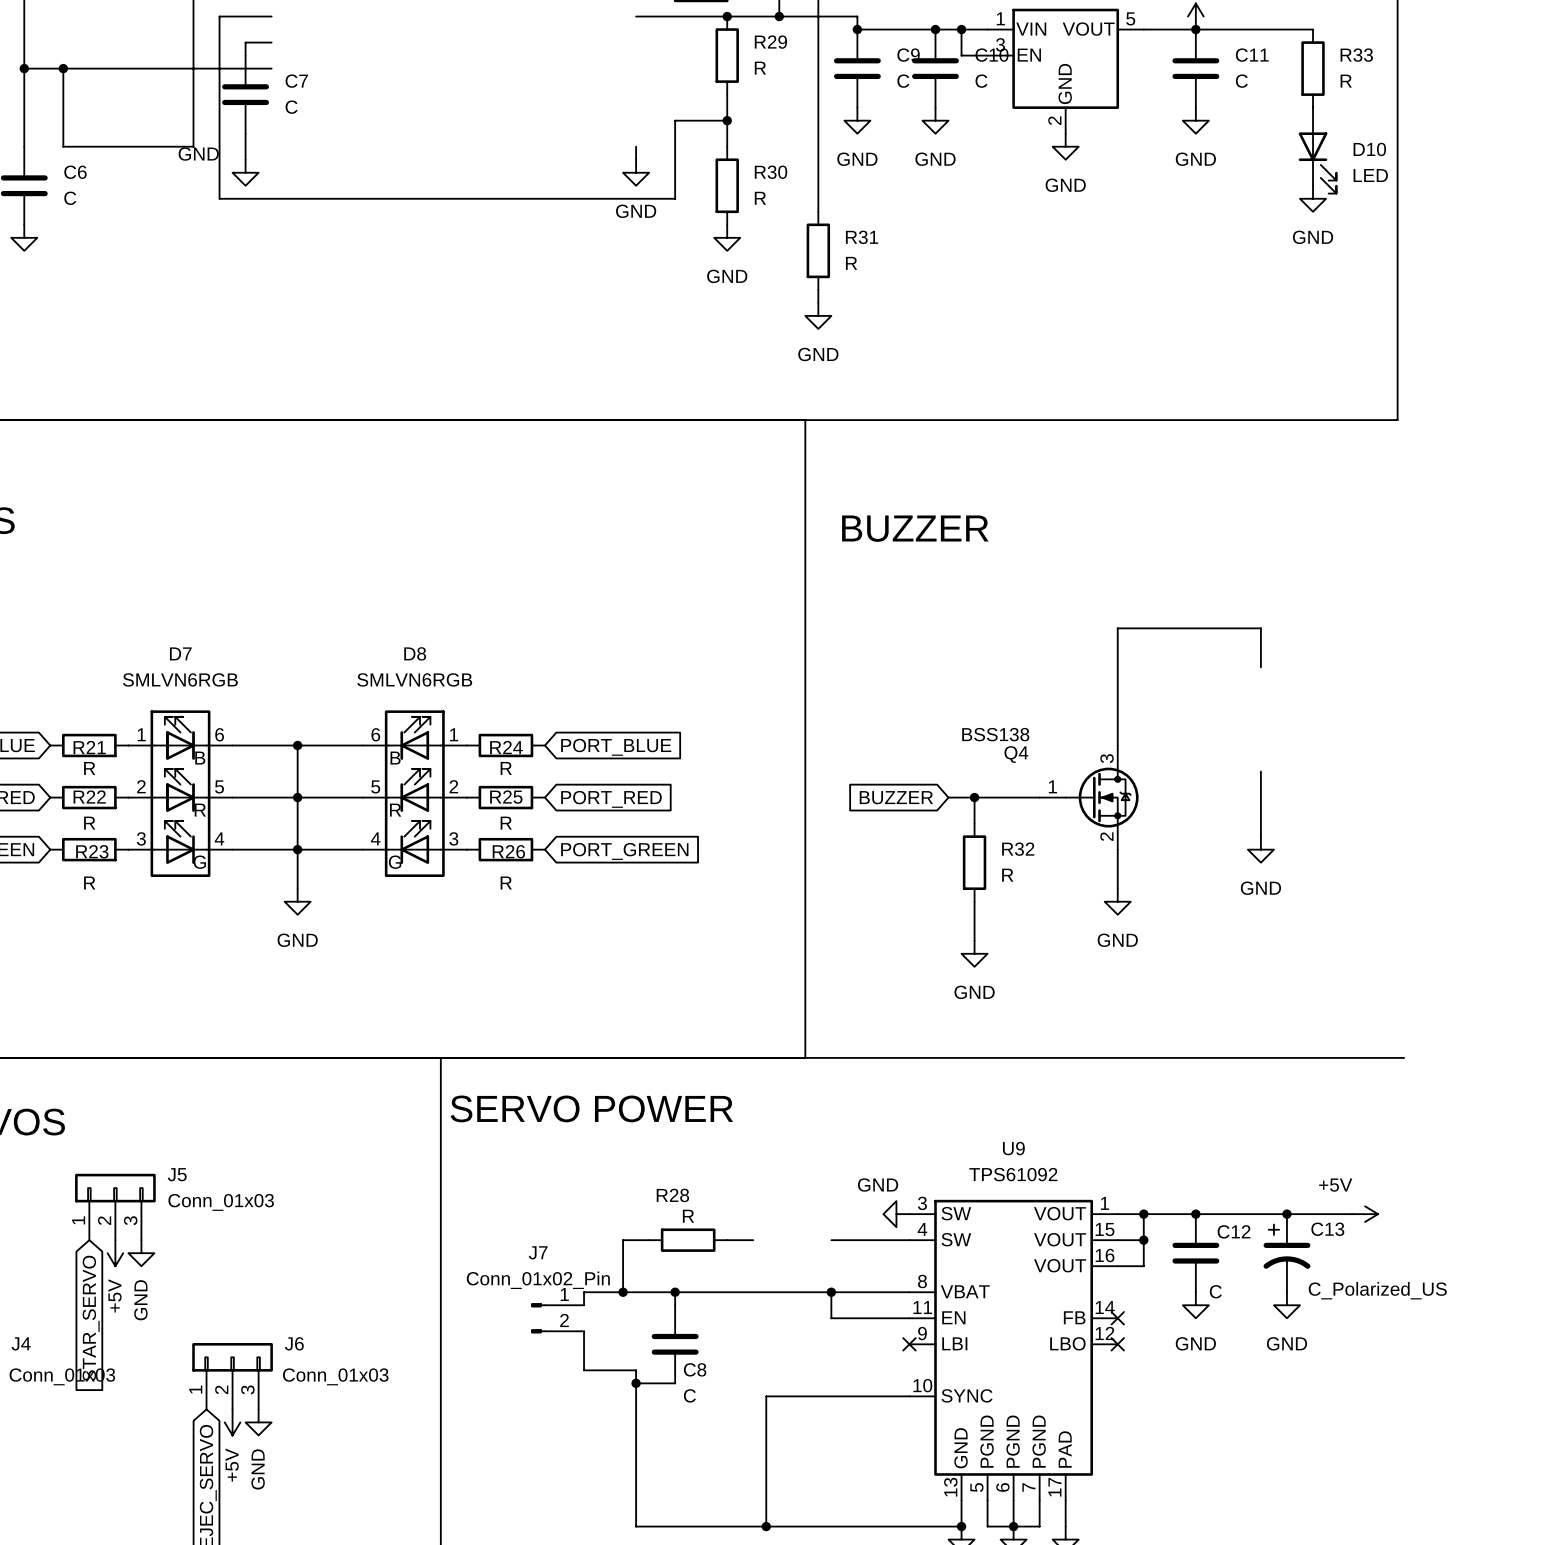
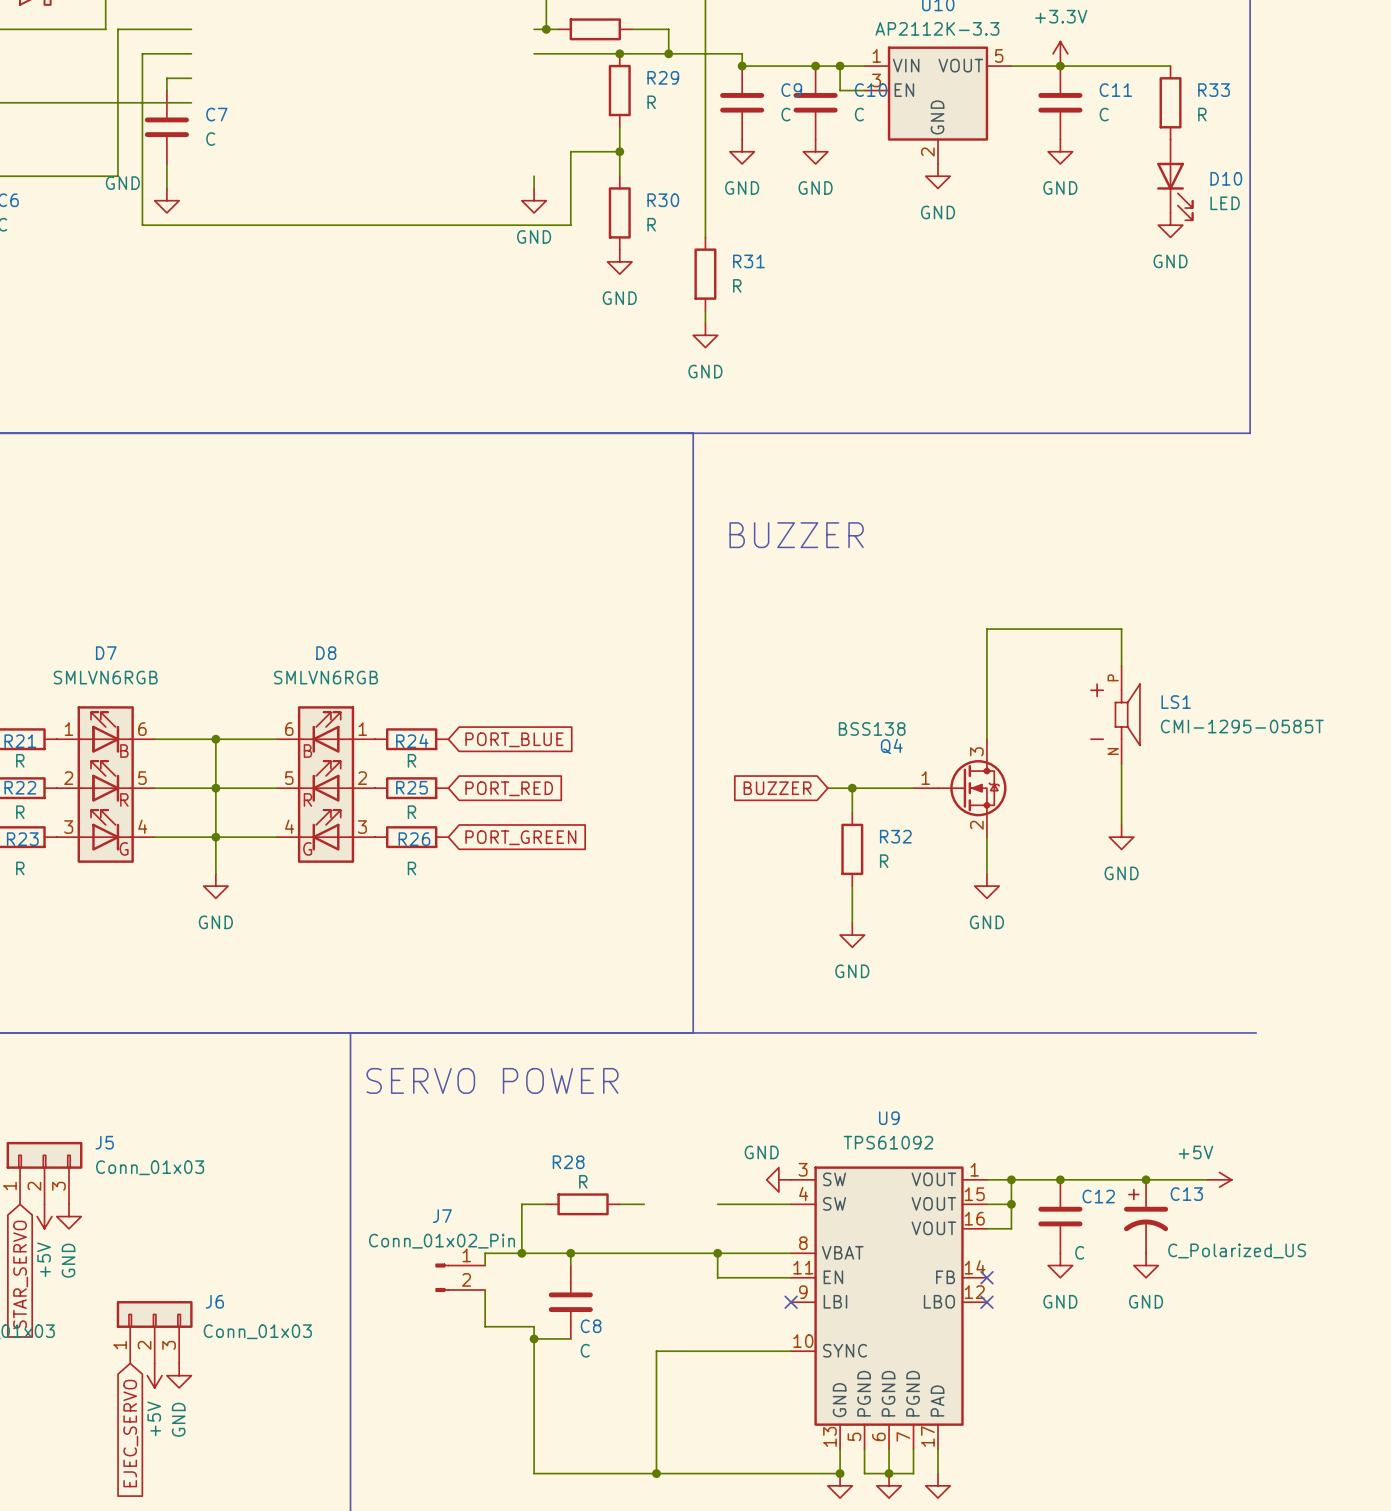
LS1: none -> CMI-1295-0585T (1115, 714)

